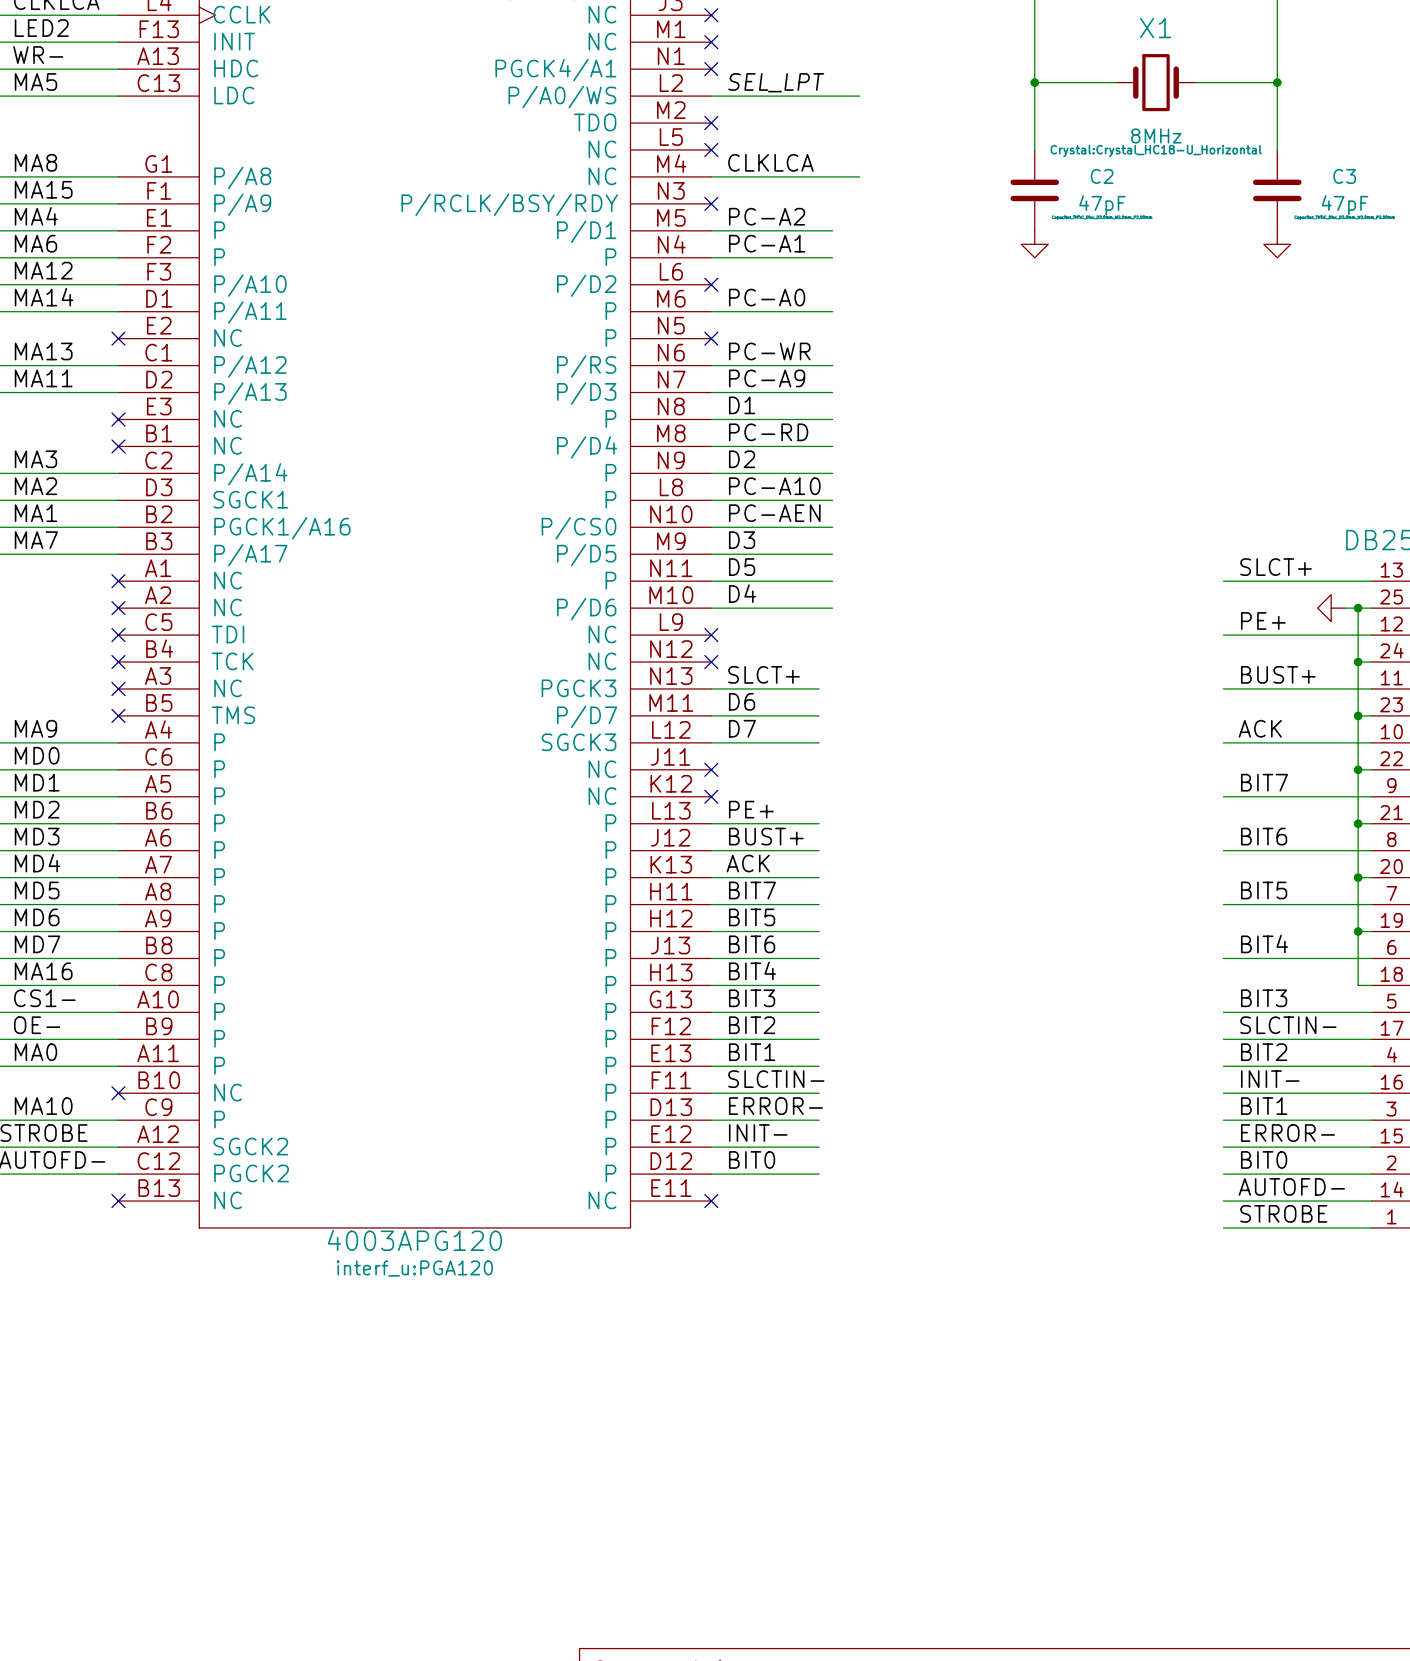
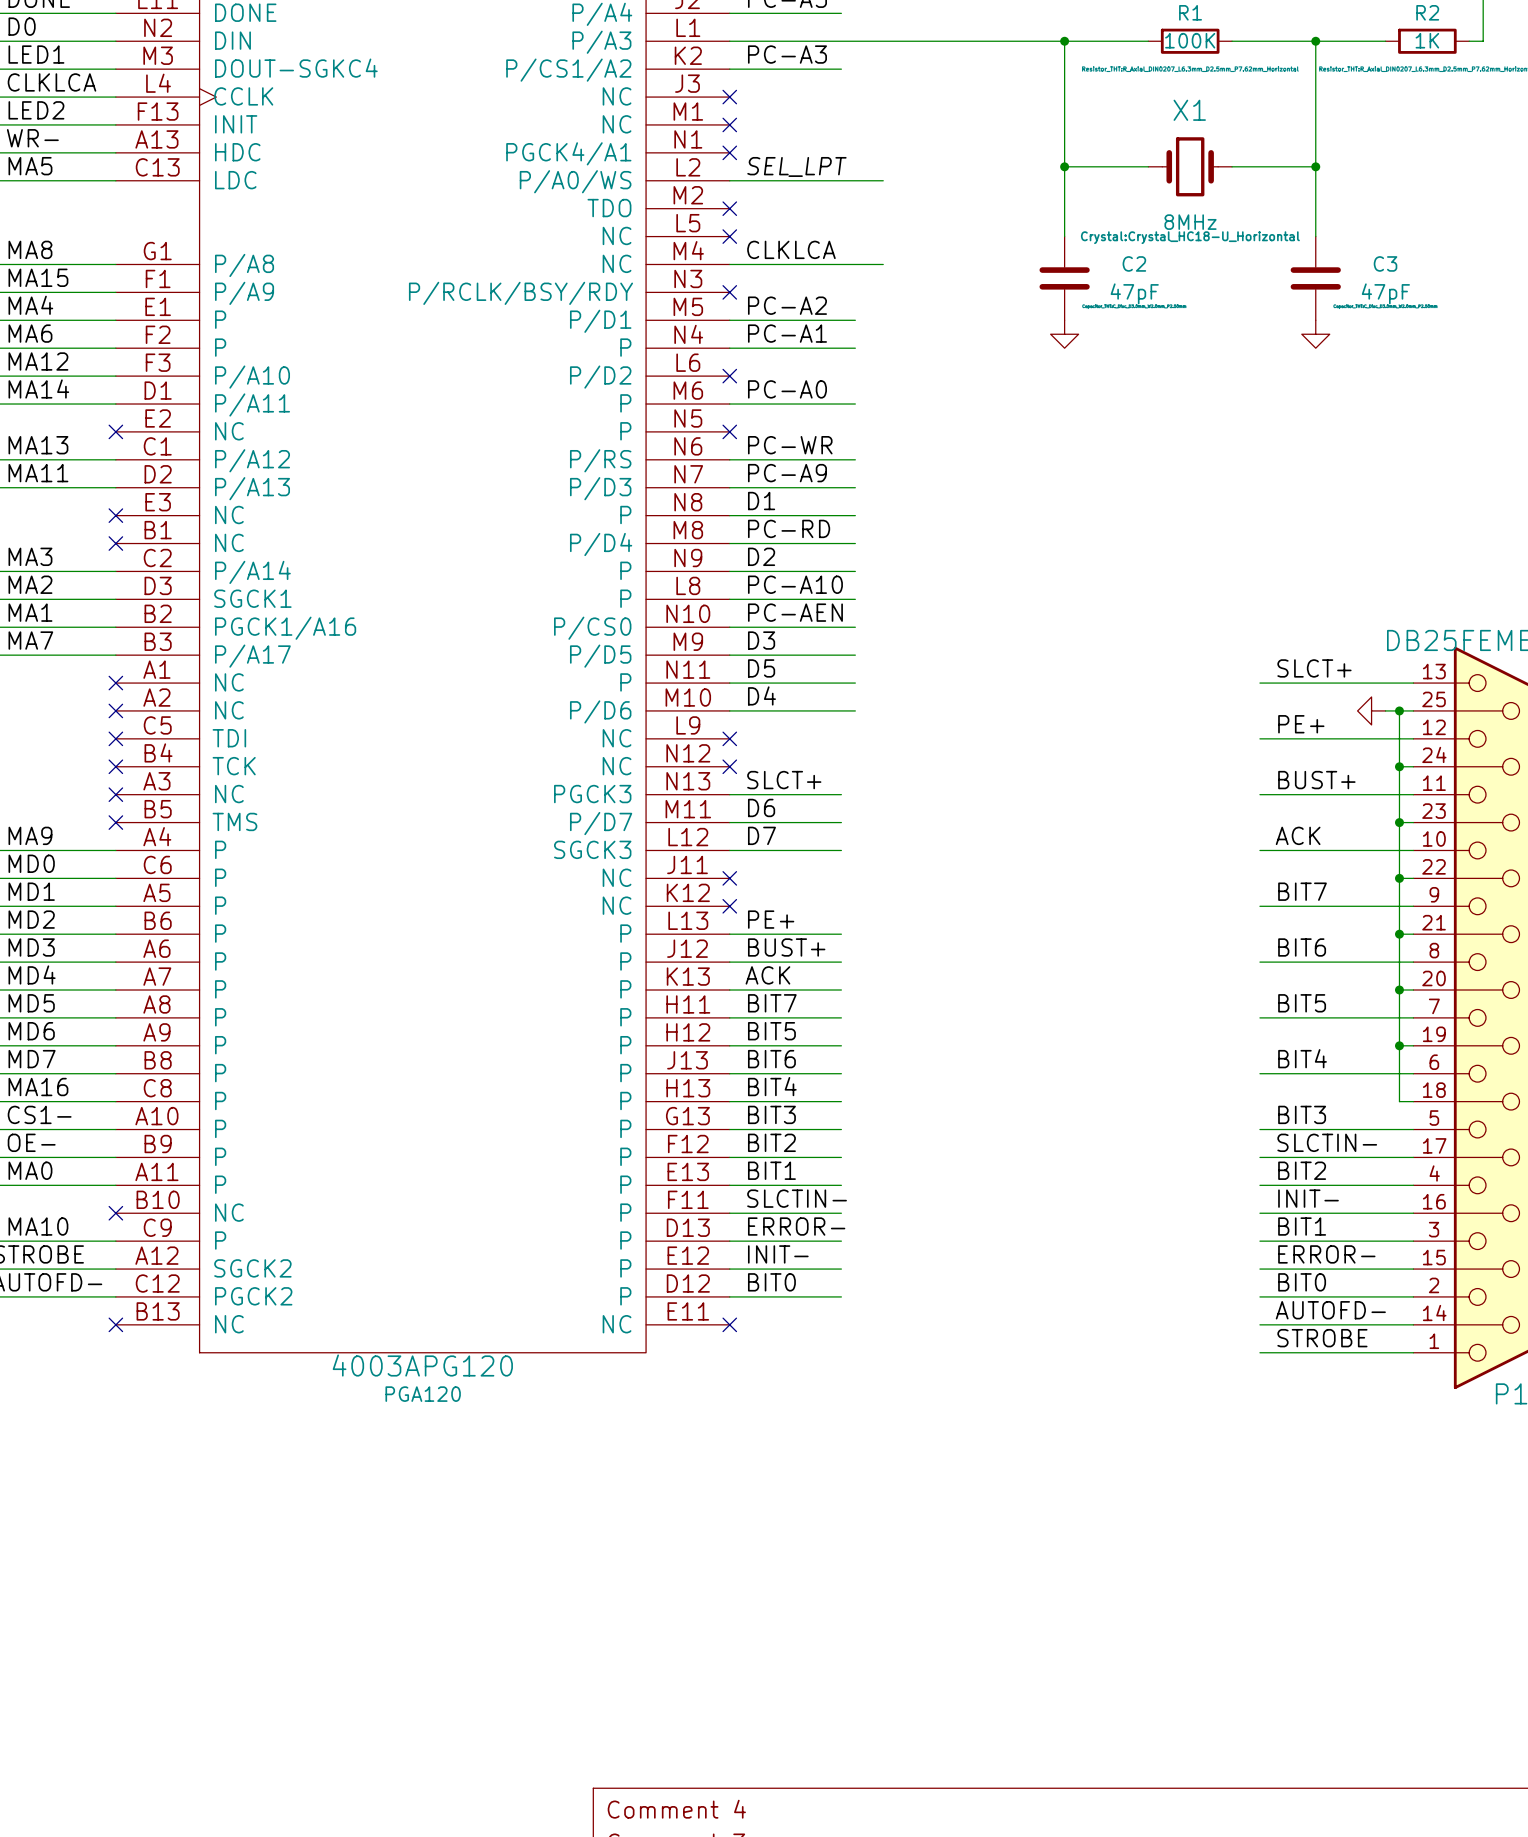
part text: interf_u:PGA120 (414, 1268) -> PGA120 (423, 1394)

